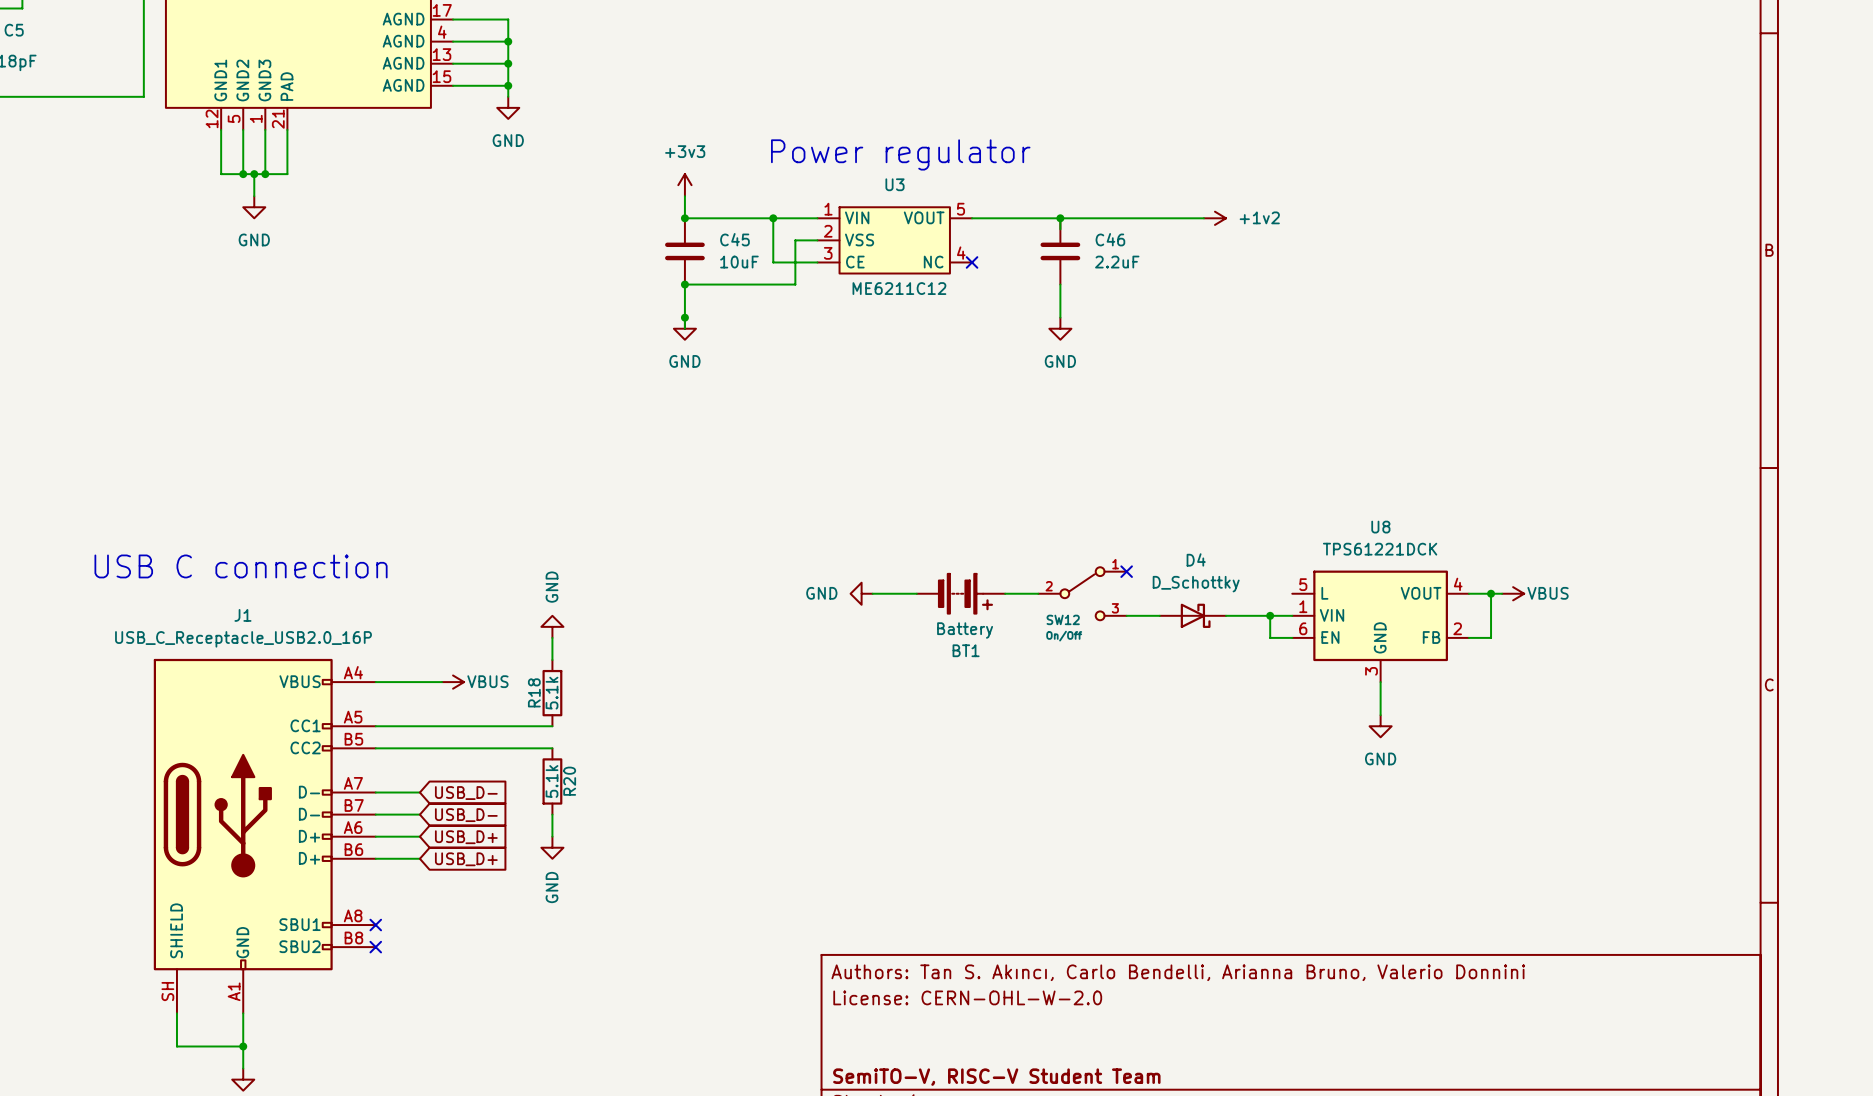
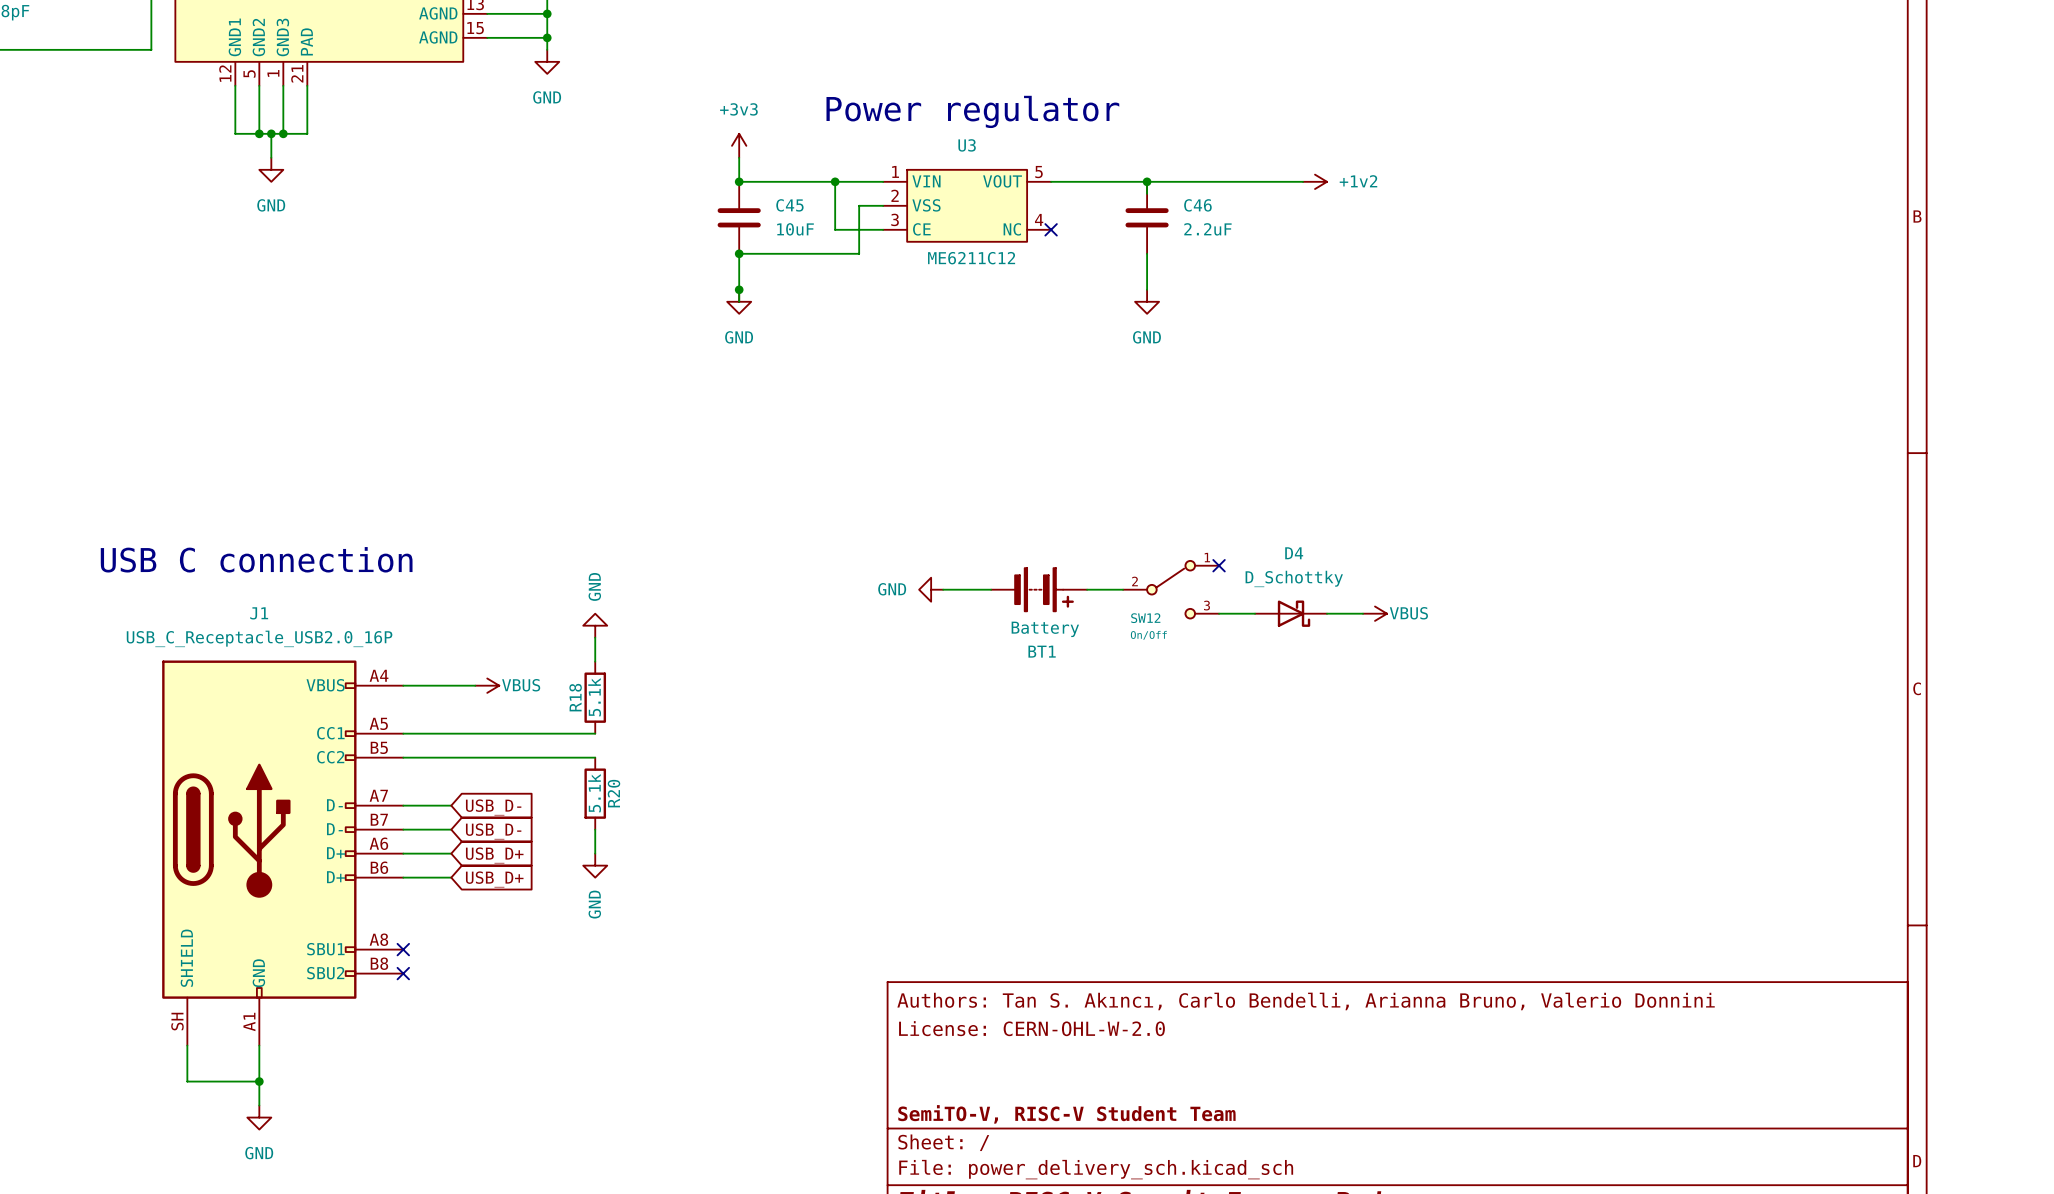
wire: (1468, 593) (1502, 593) -> none
wire: (1491, 593) (1491, 637) (1468, 637) -> none
junction: (1491, 593) -> none
power symbol: VBUS (1513, 593) -> none
wire: (1270, 615) (1270, 637) (1292, 637) -> none
junction: (1270, 615) -> none
power symbol: none -> VBUS (1375, 613)
U8: TPS61221DCK (1380, 626) -> none
wire: (1380, 682) (1380, 715) -> none
power symbol: GND (1380, 726) -> none

